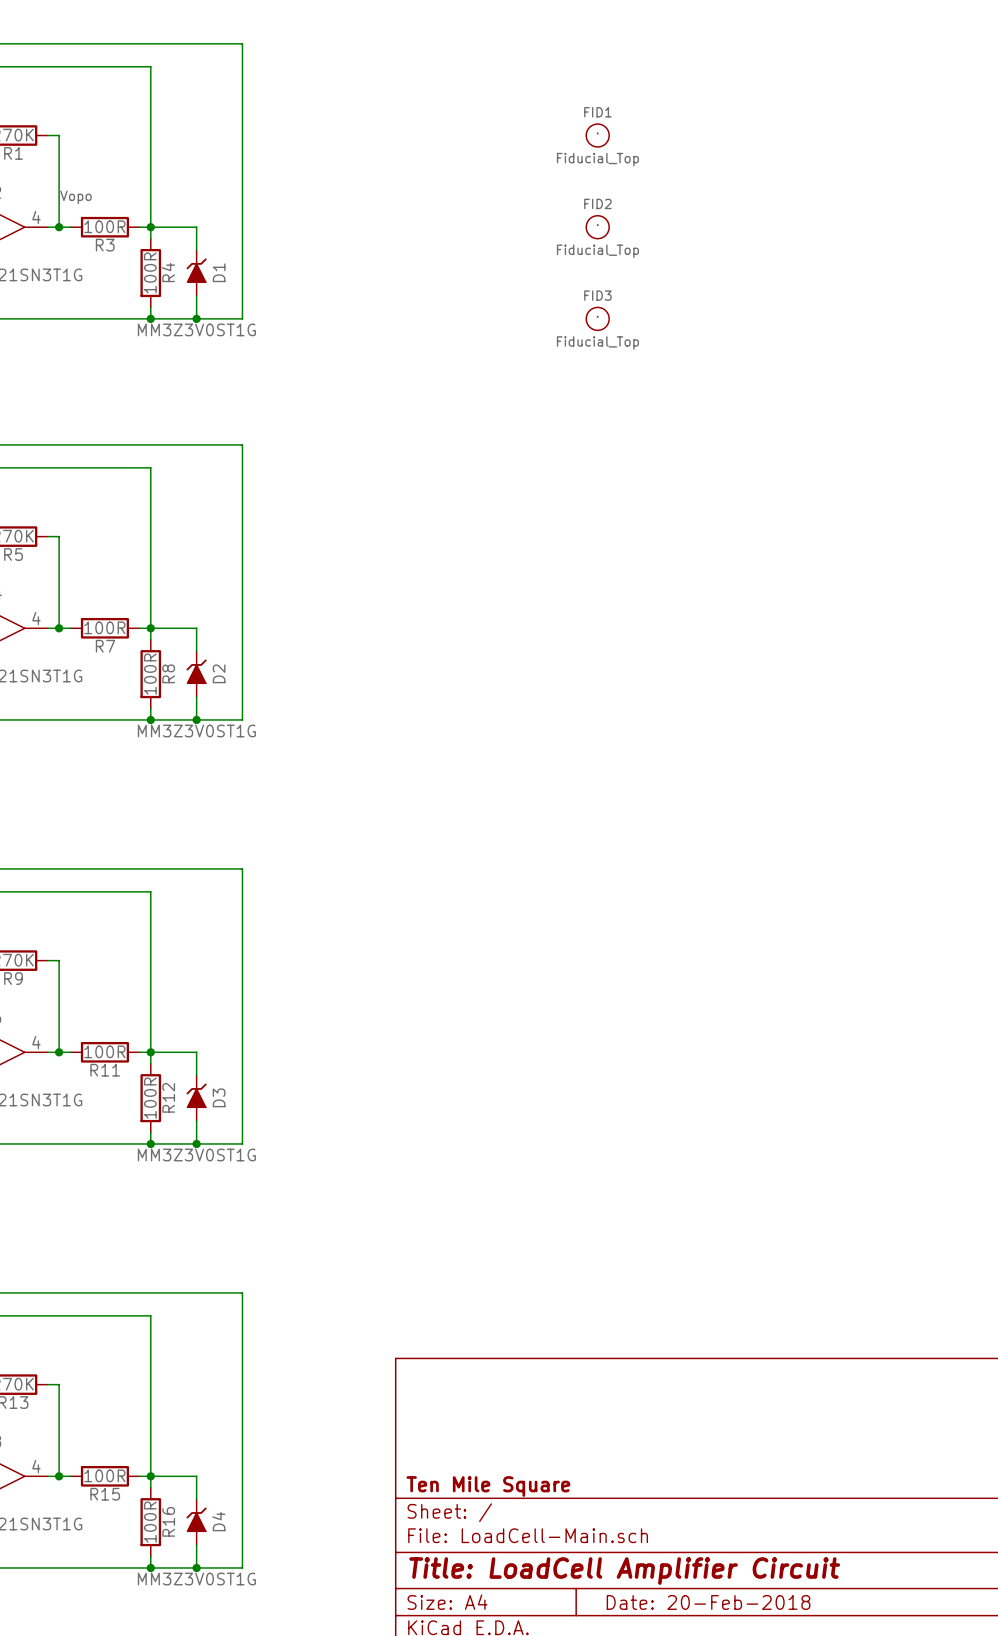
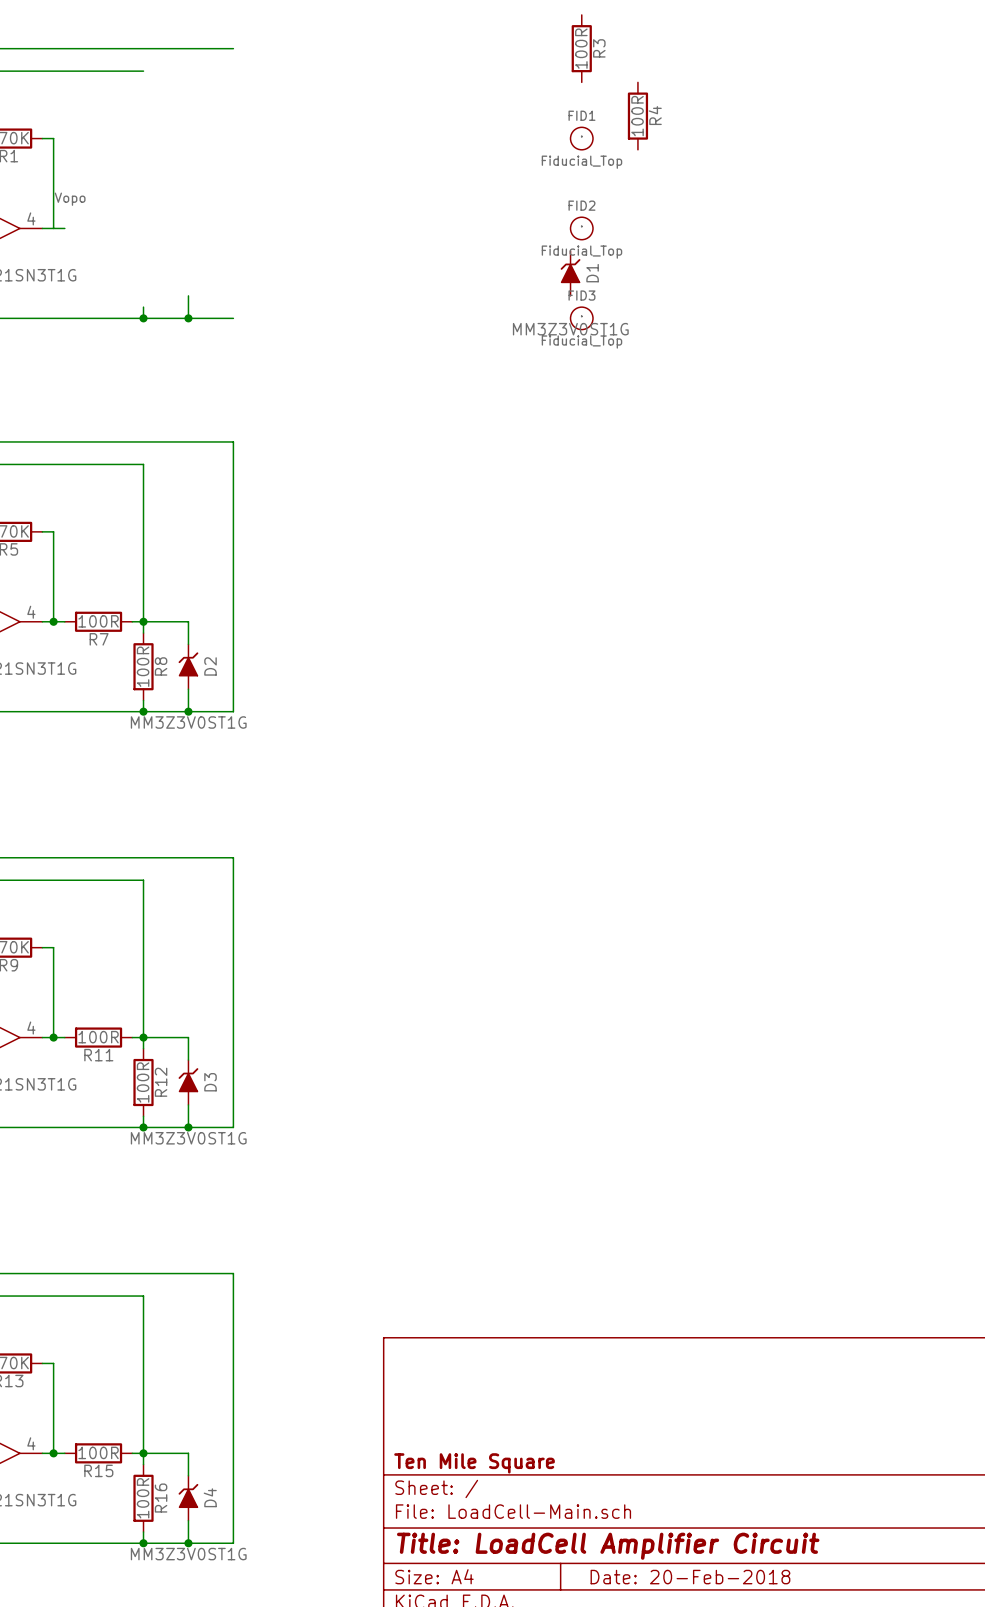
wire: (242, 43) (242, 318) -> none
wire: (150, 66) (150, 238) -> none
junction: (59, 227) -> none
R3 rotation: 0° (104, 227) -> 90° clockwise (581, 48)
R3 position: (104, 227) -> (581, 48)
wire: (139, 227) (196, 227) (196, 250) -> none
junction: (150, 227) -> none
R3 name position: R3 (105, 245) -> R3 (599, 48)
R4 position: (150, 273) -> (637, 116)
D1 position: (196, 273) -> (570, 273)

